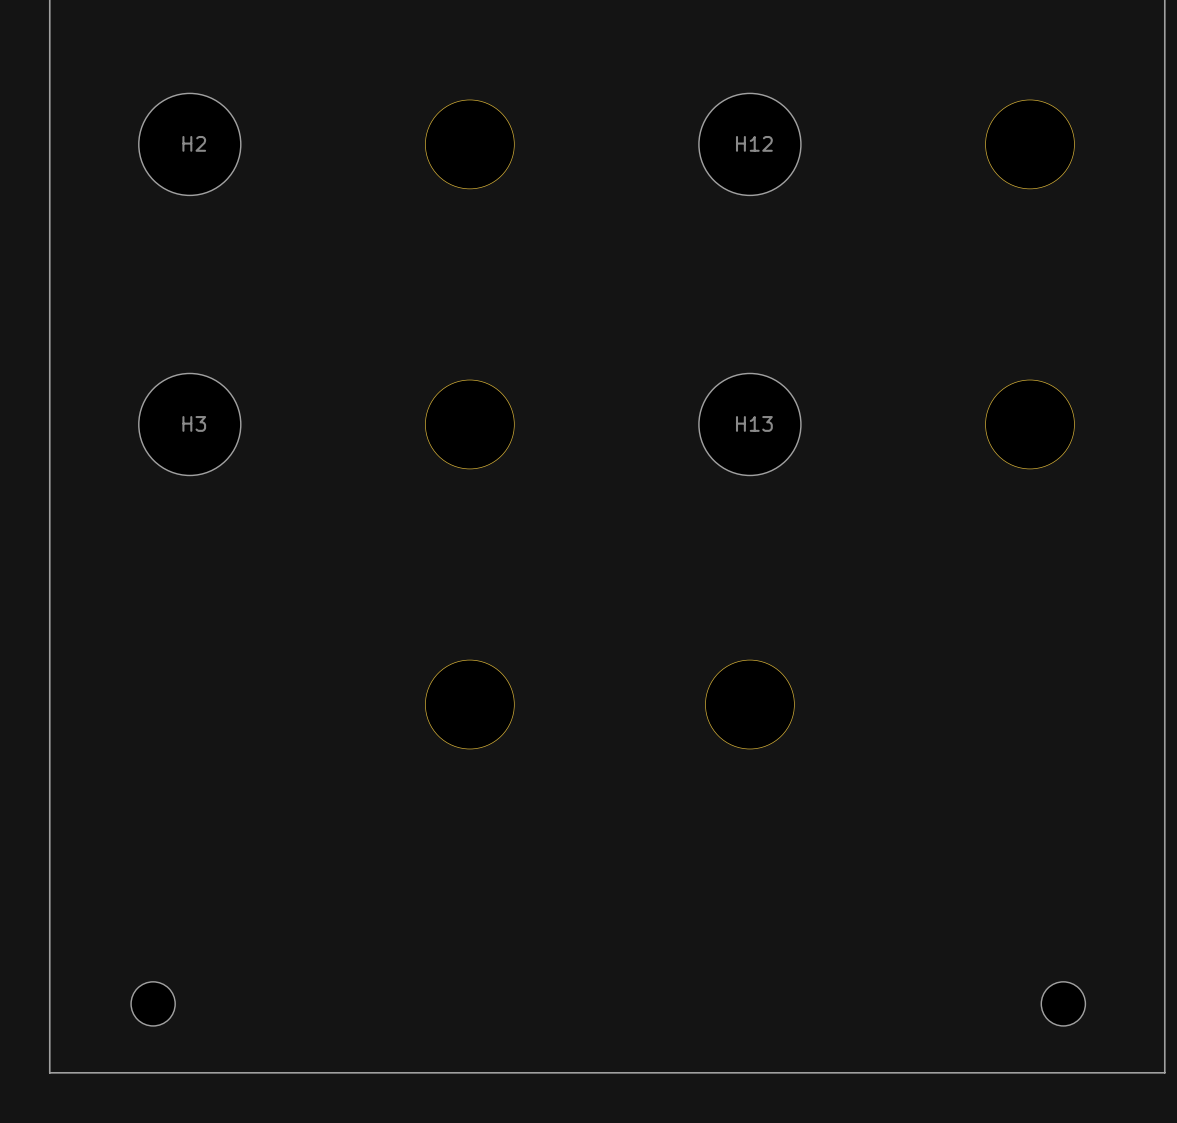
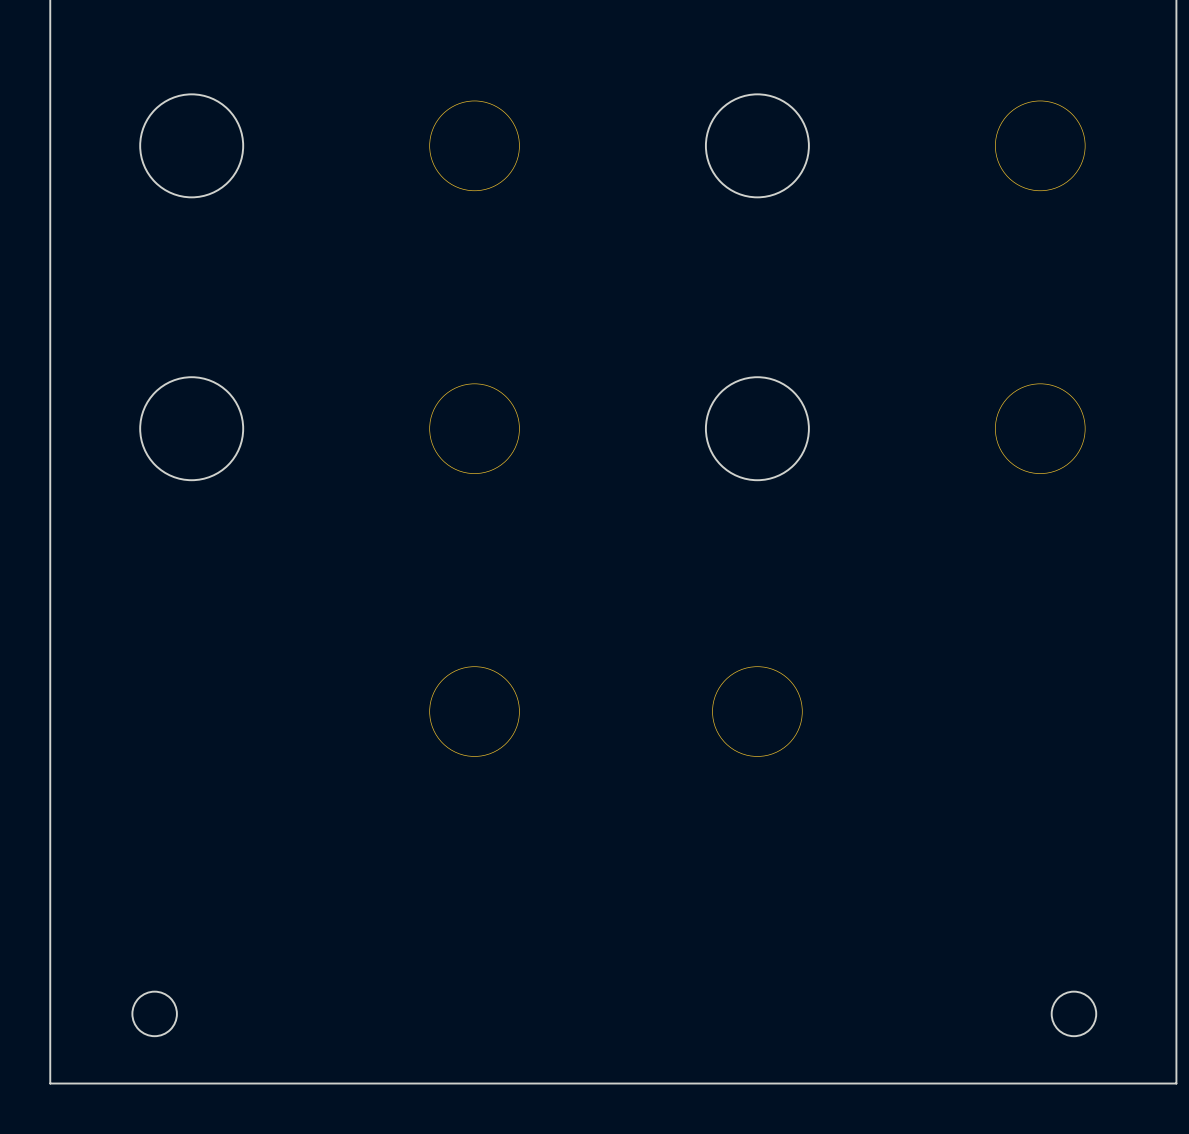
H2 name: H2 (194, 143) -> none
H12 name: H12 (754, 143) -> none
H3 name: H3 (194, 423) -> none
H13 name: H13 (754, 423) -> none

